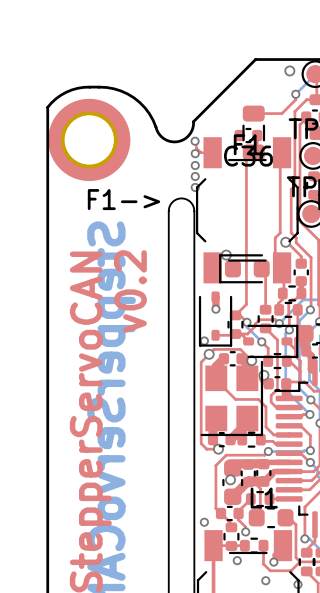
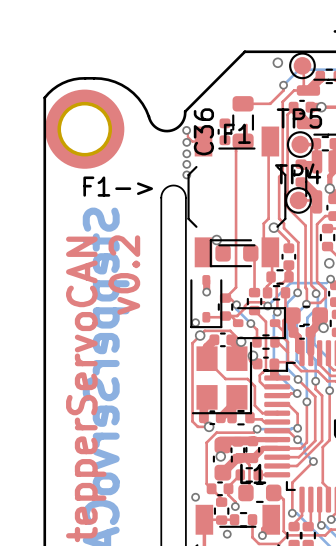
C36 rotation: 0° (248, 135) -> 90° clockwise (224, 131)

